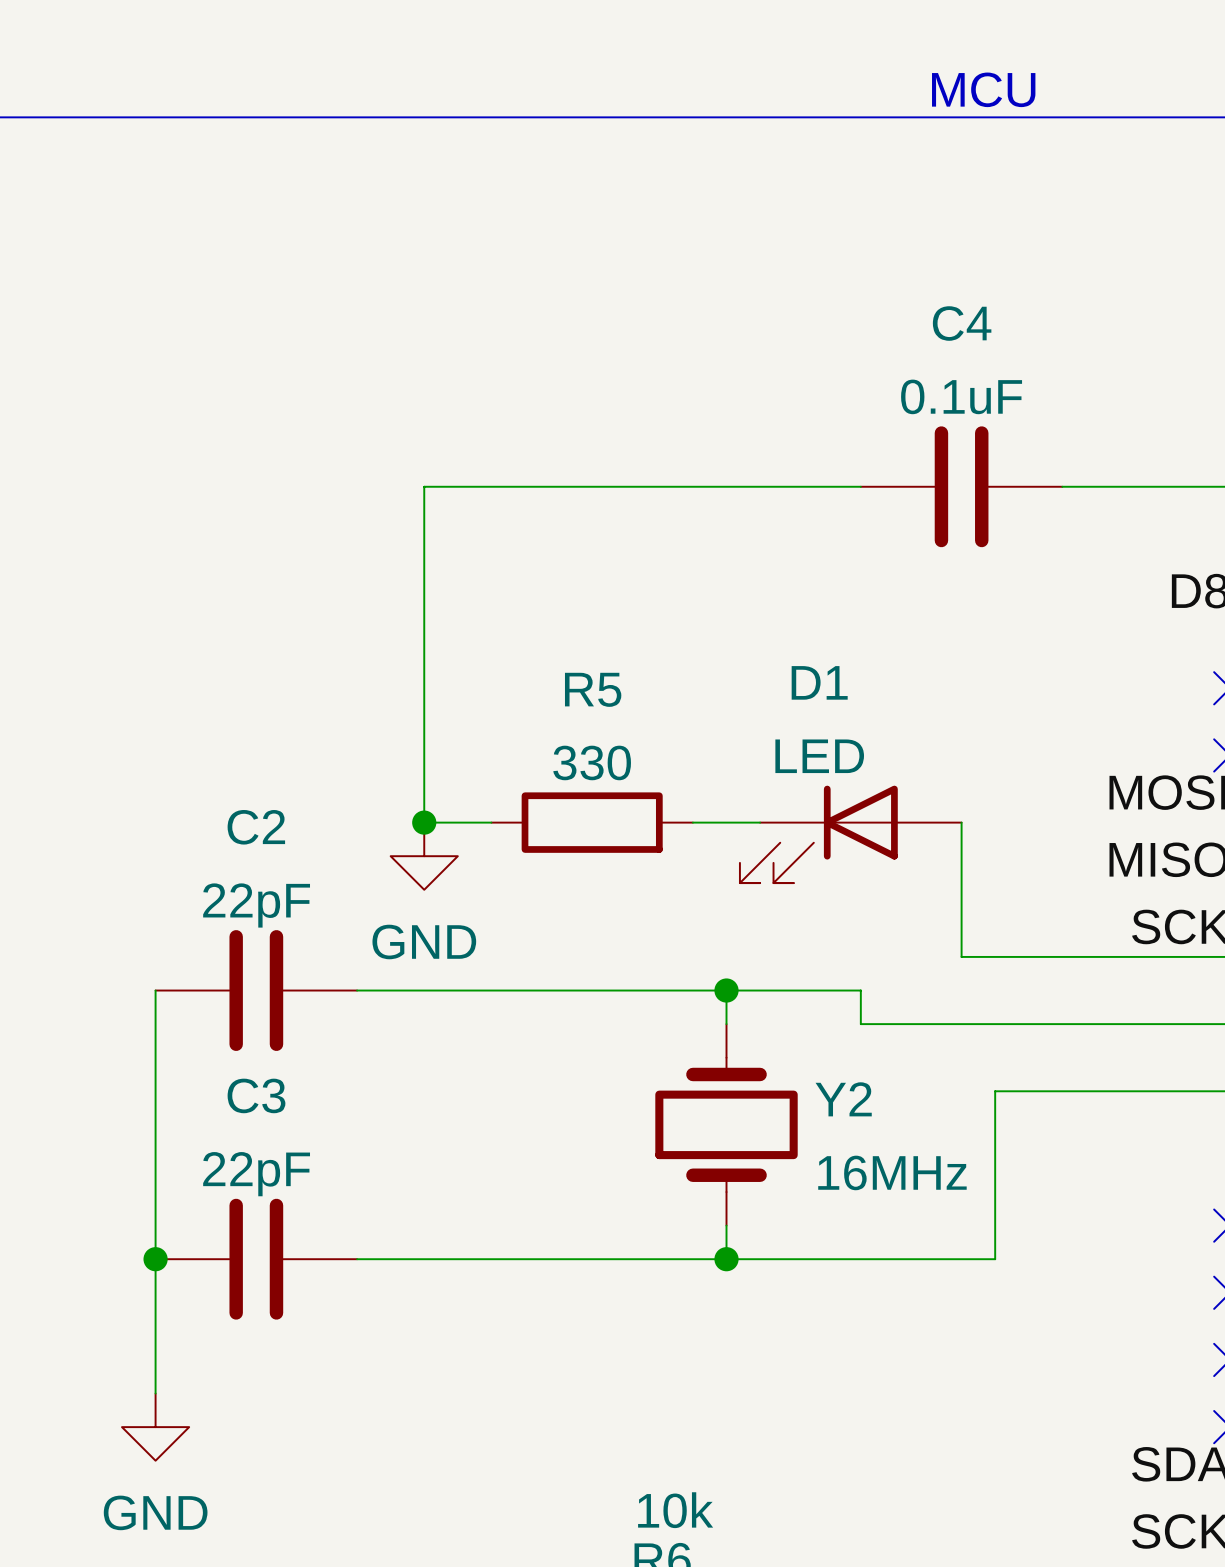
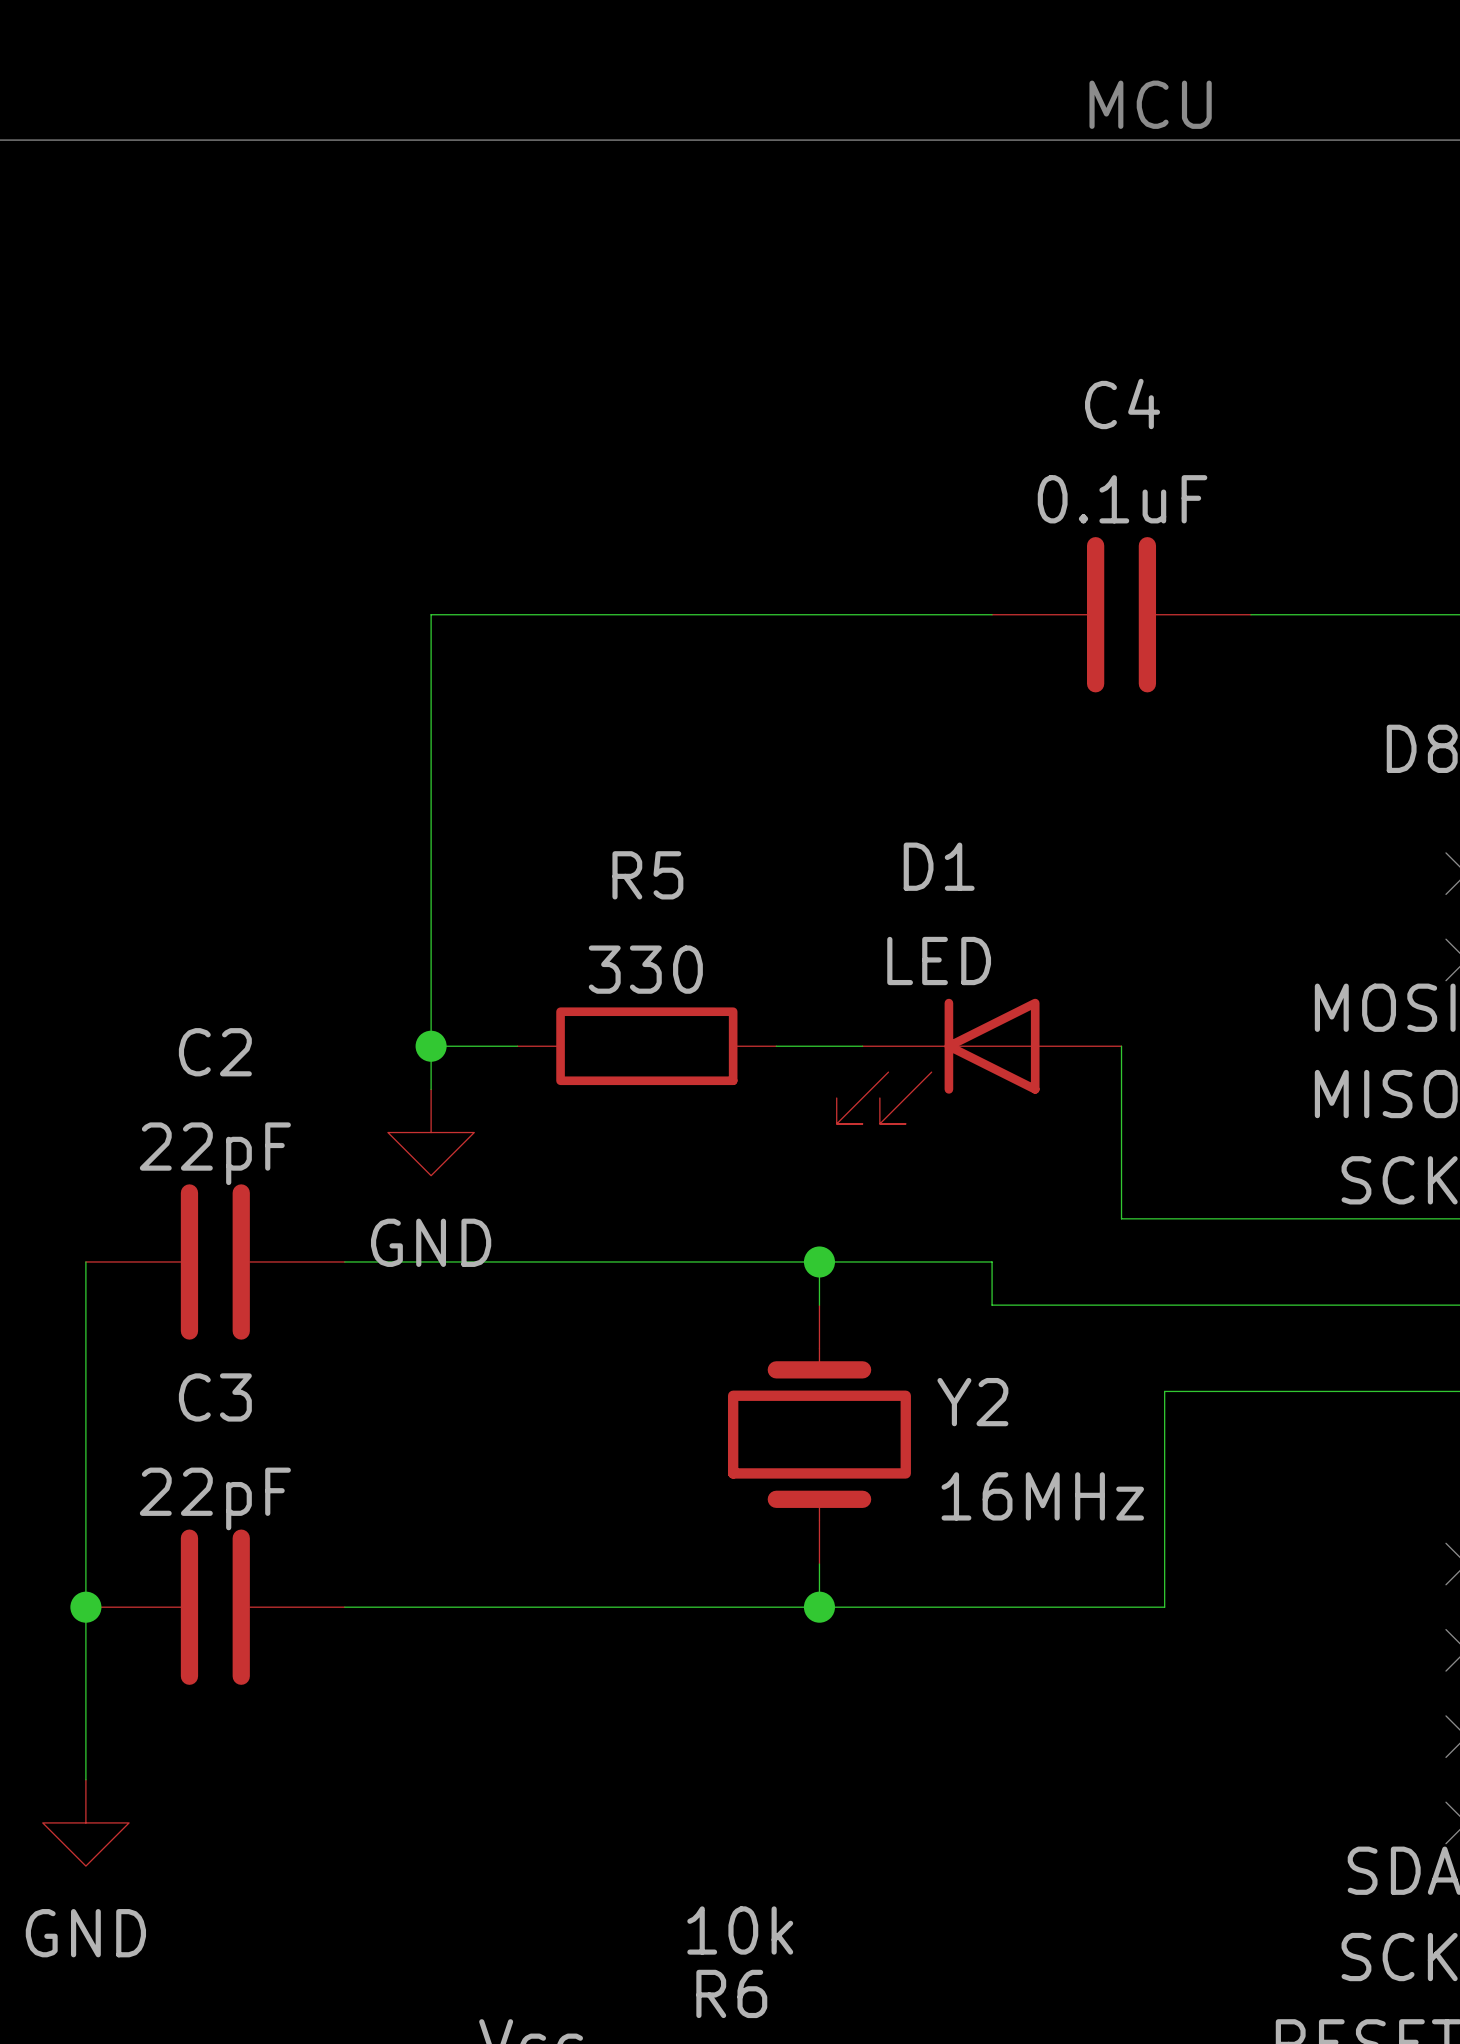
power symbol position: GND (424, 856) -> GND (431, 1132)

